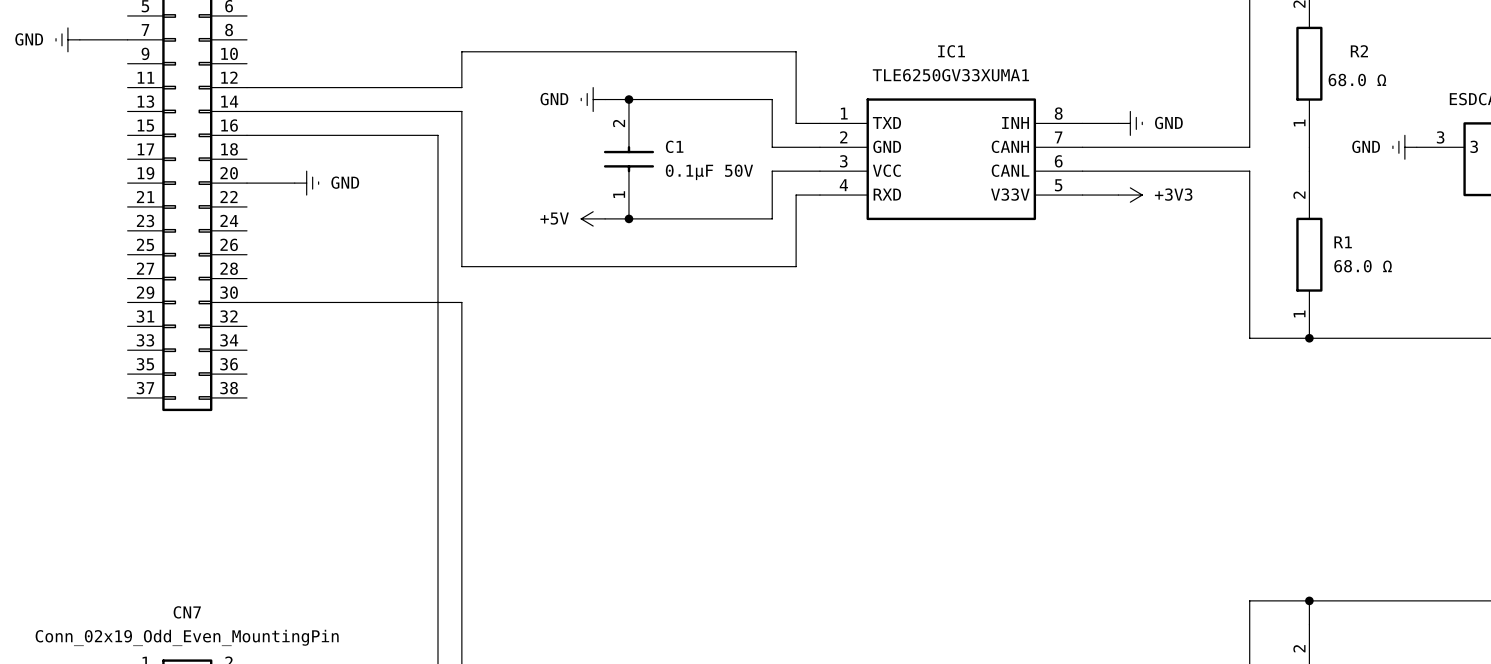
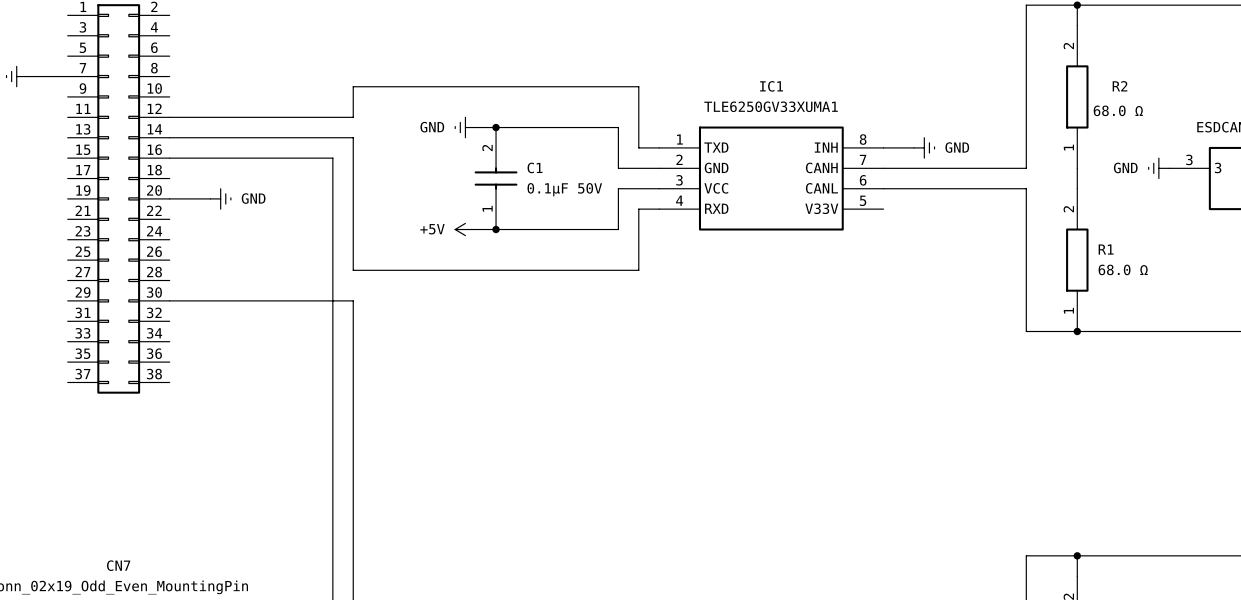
wire: (1082, 195) (1118, 195) -> none
power symbol: +3V3 (1130, 195) -> none

